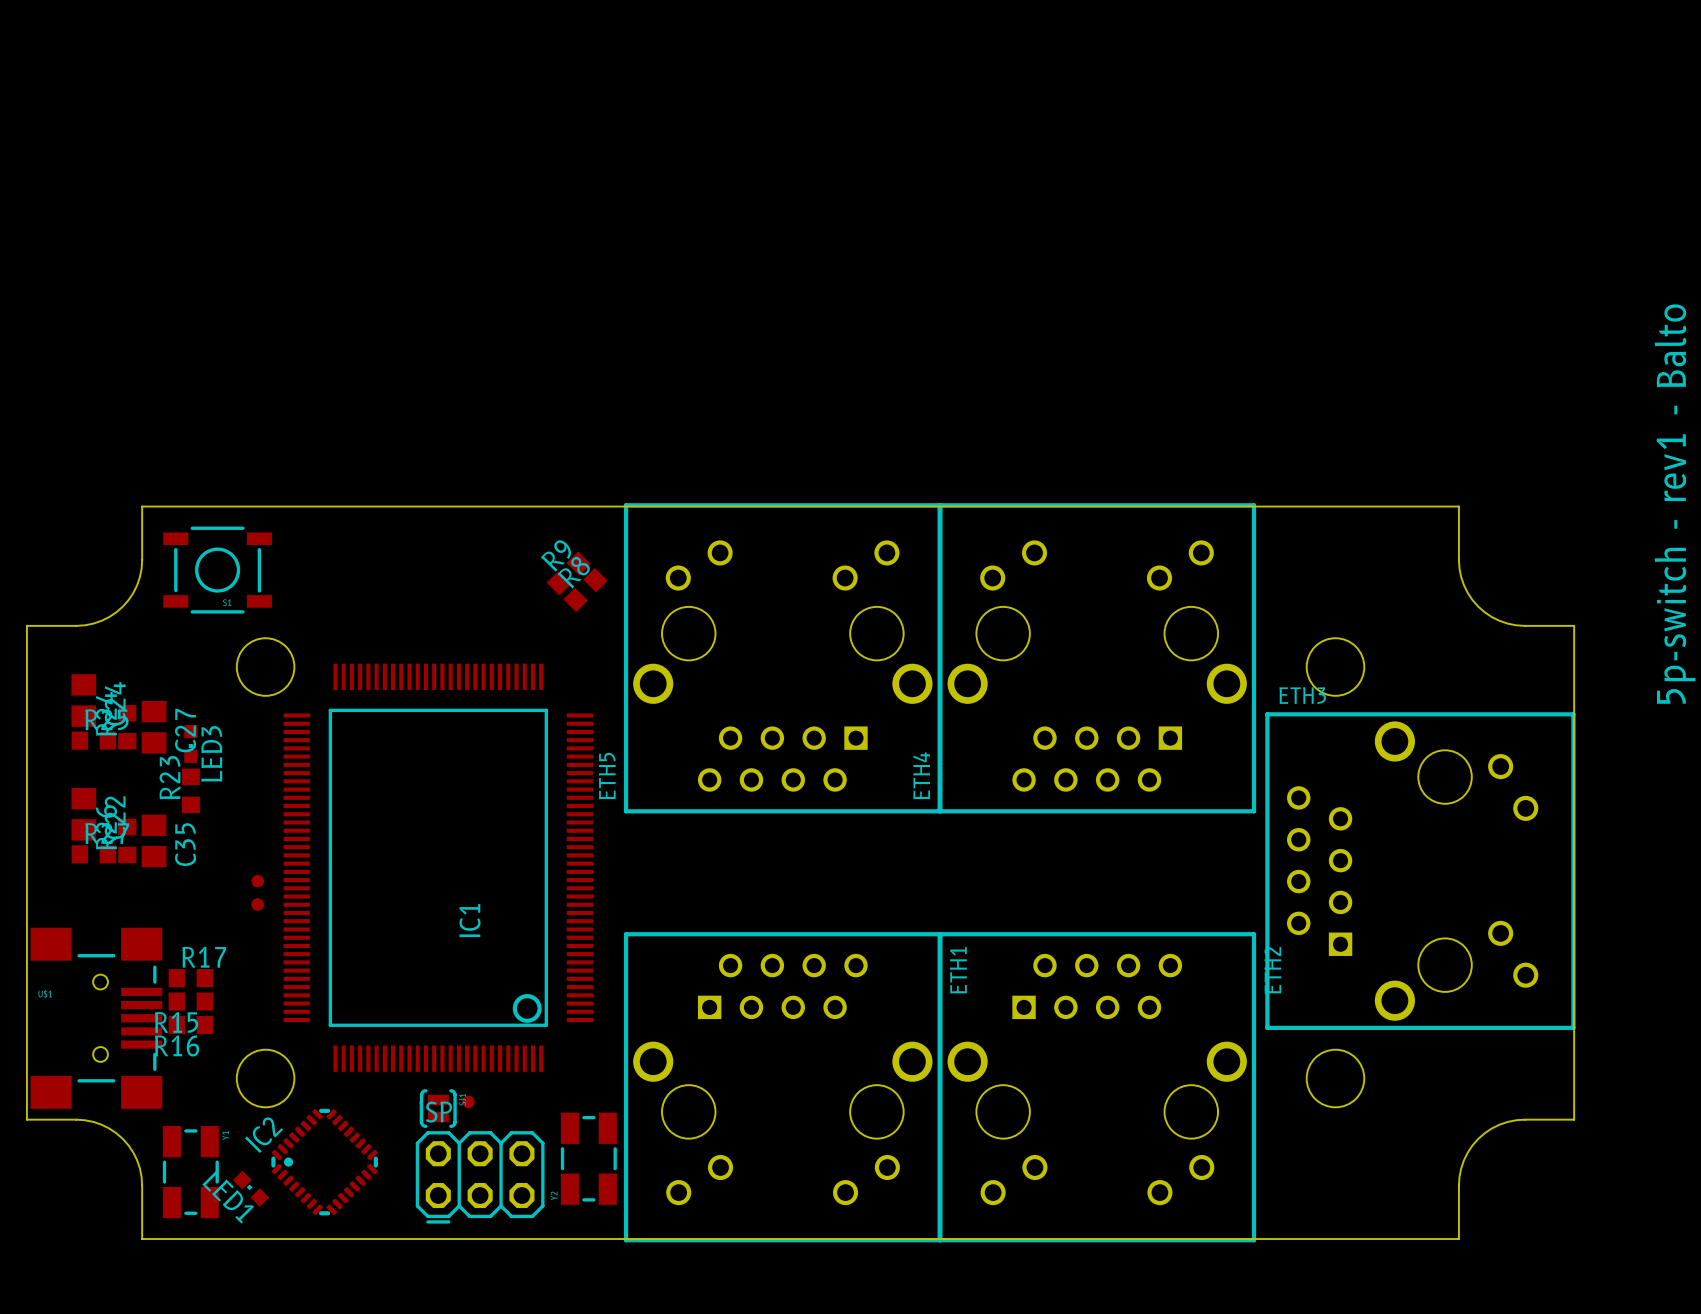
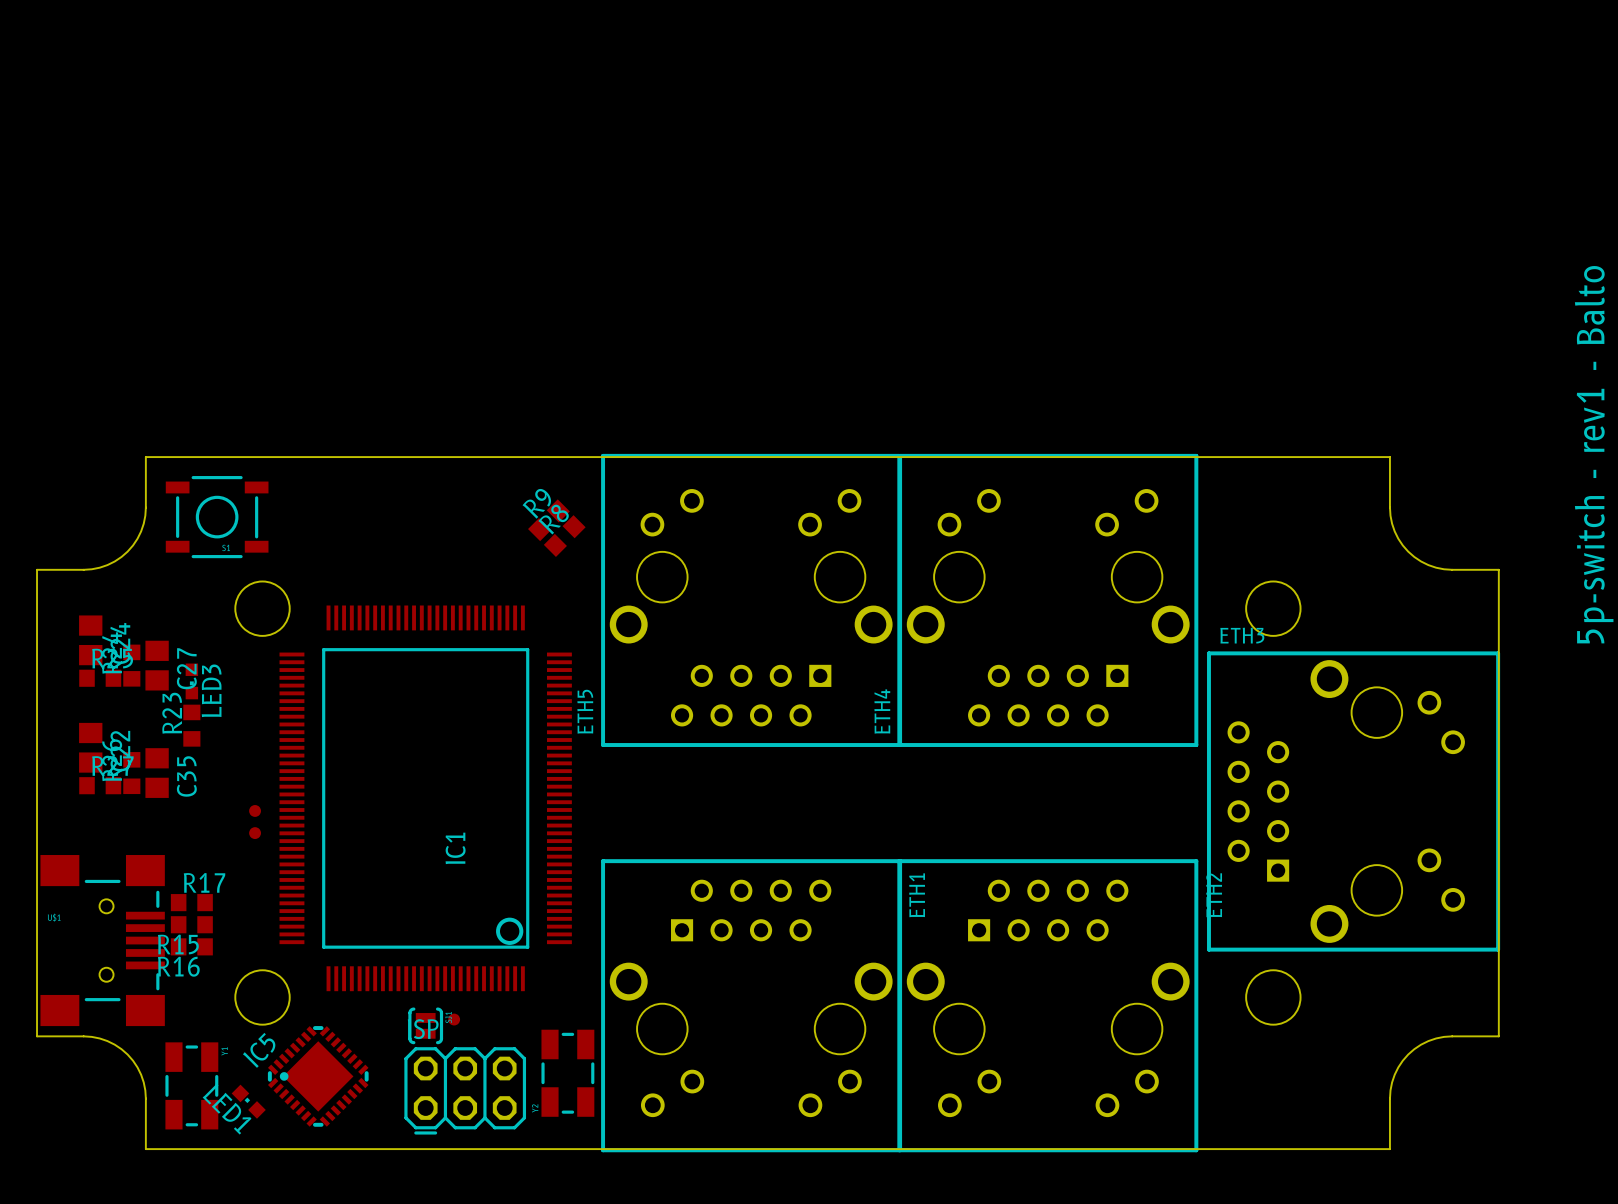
IC2: (324, 1162) -> none
IC5: none -> (318, 1076)

